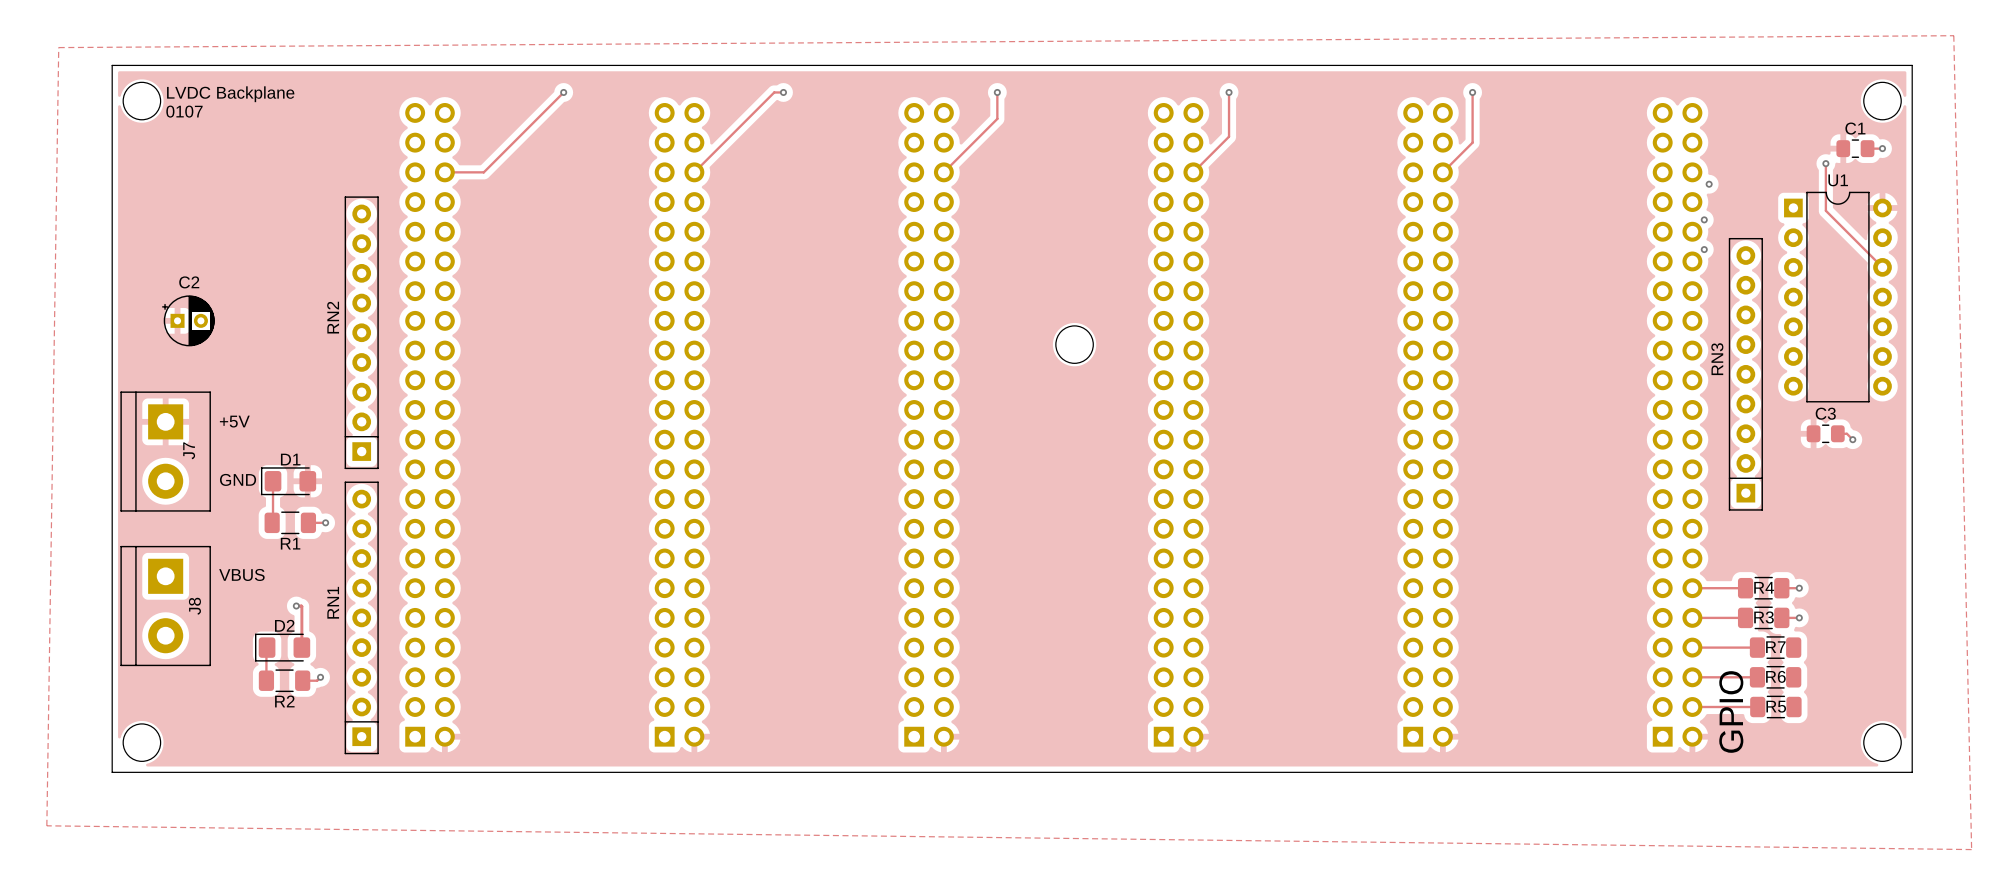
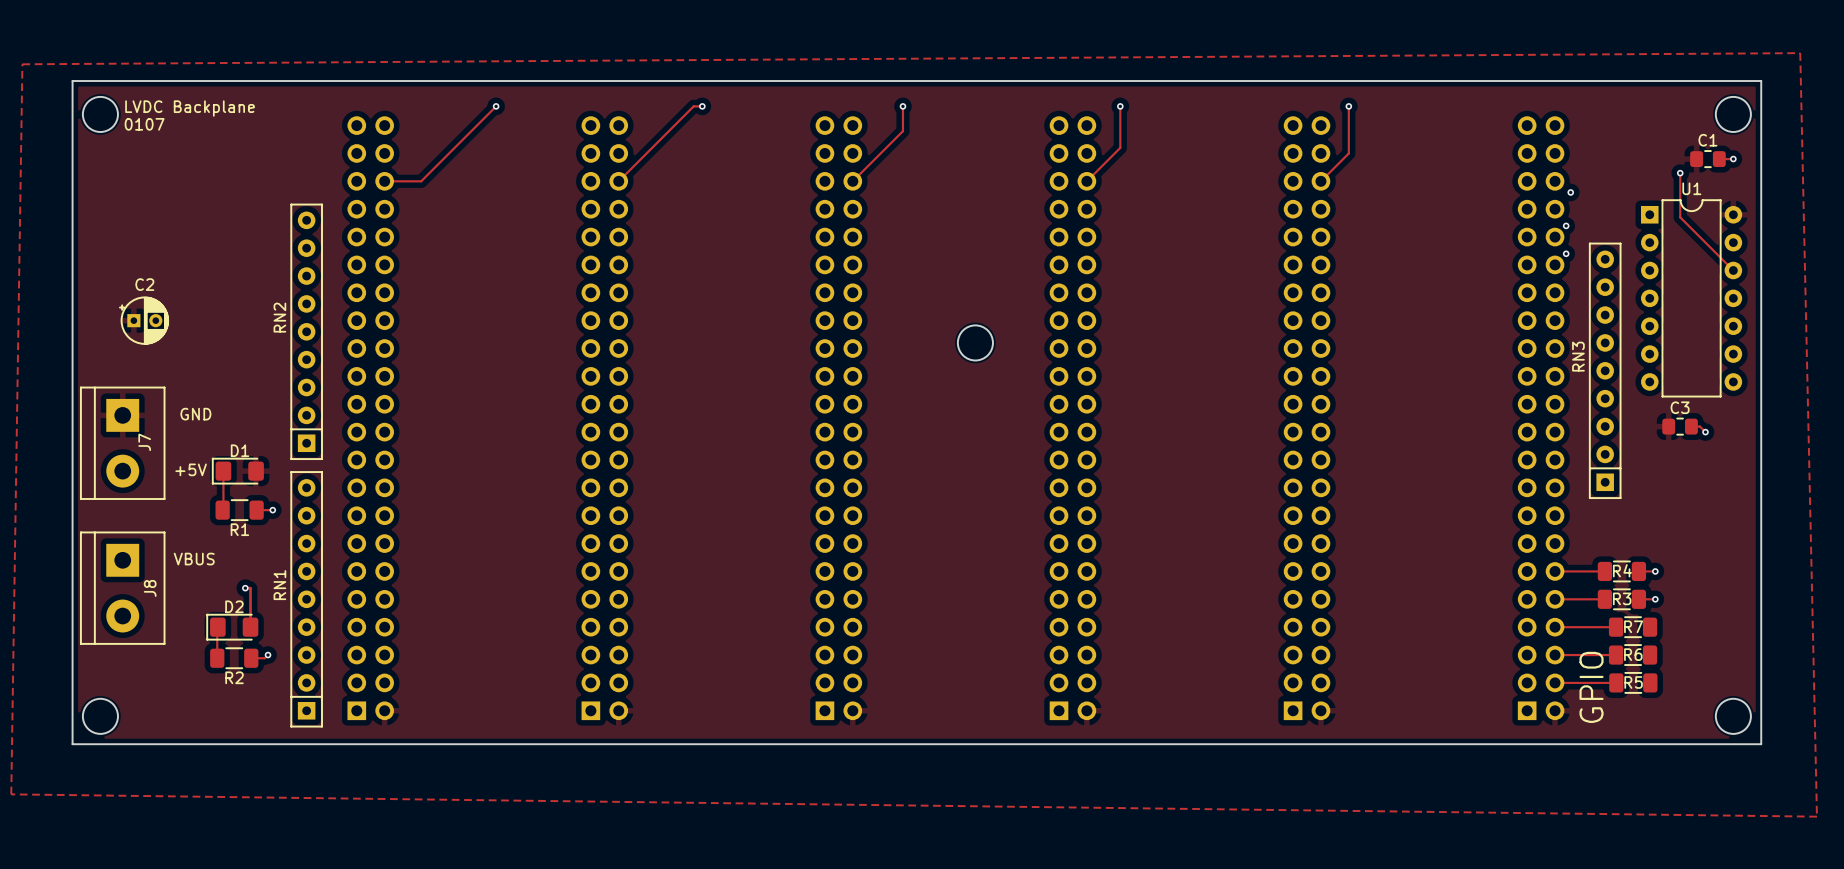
text: +5V (234, 421) -> GND (195, 414)
text: GND (238, 479) -> +5V (191, 469)

